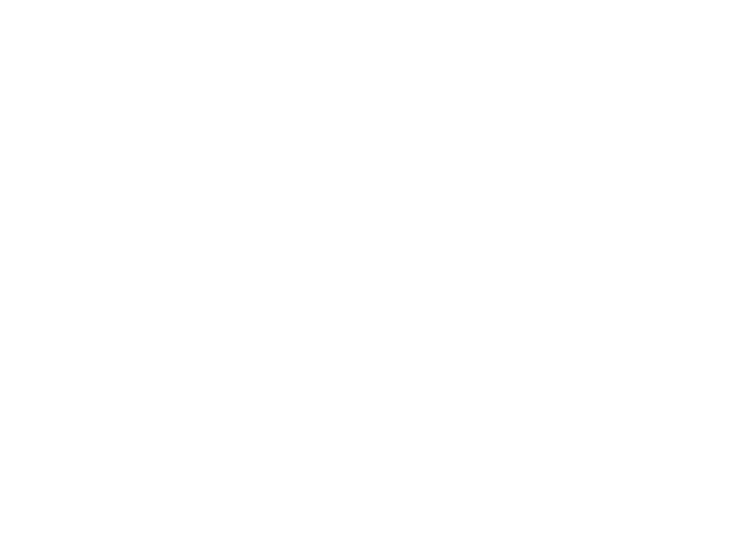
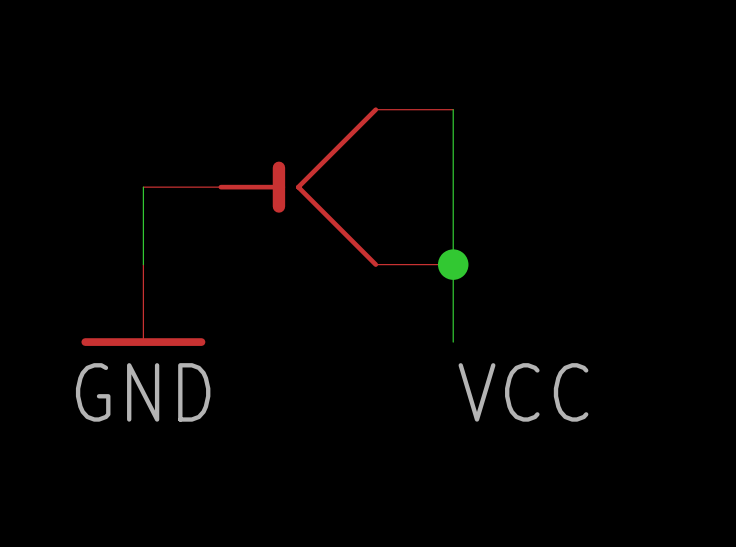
wire: none -> (453, 109) (453, 342)
wire: none -> (143, 187) (143, 264)
part: none -> (298, 187)
junction: none -> (453, 264)
power symbol: none -> GND (143, 305)
label: none -> VCC (523, 392)

